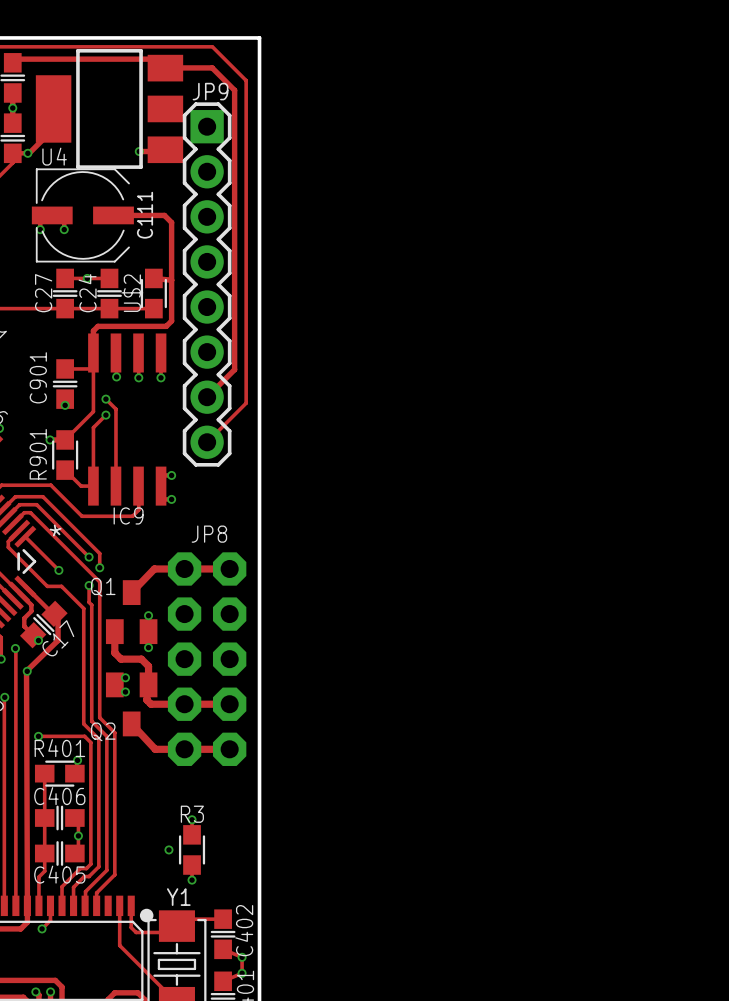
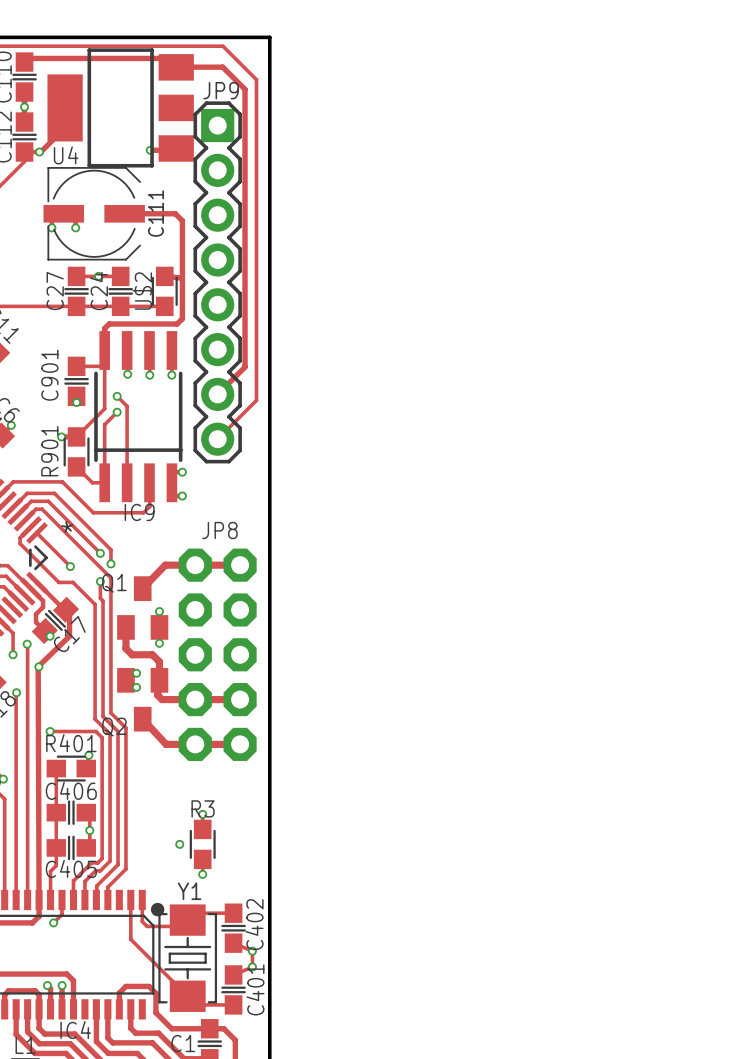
IC9 footprint: [88, 333, 167, 506] -> [94, 331, 183, 503]

